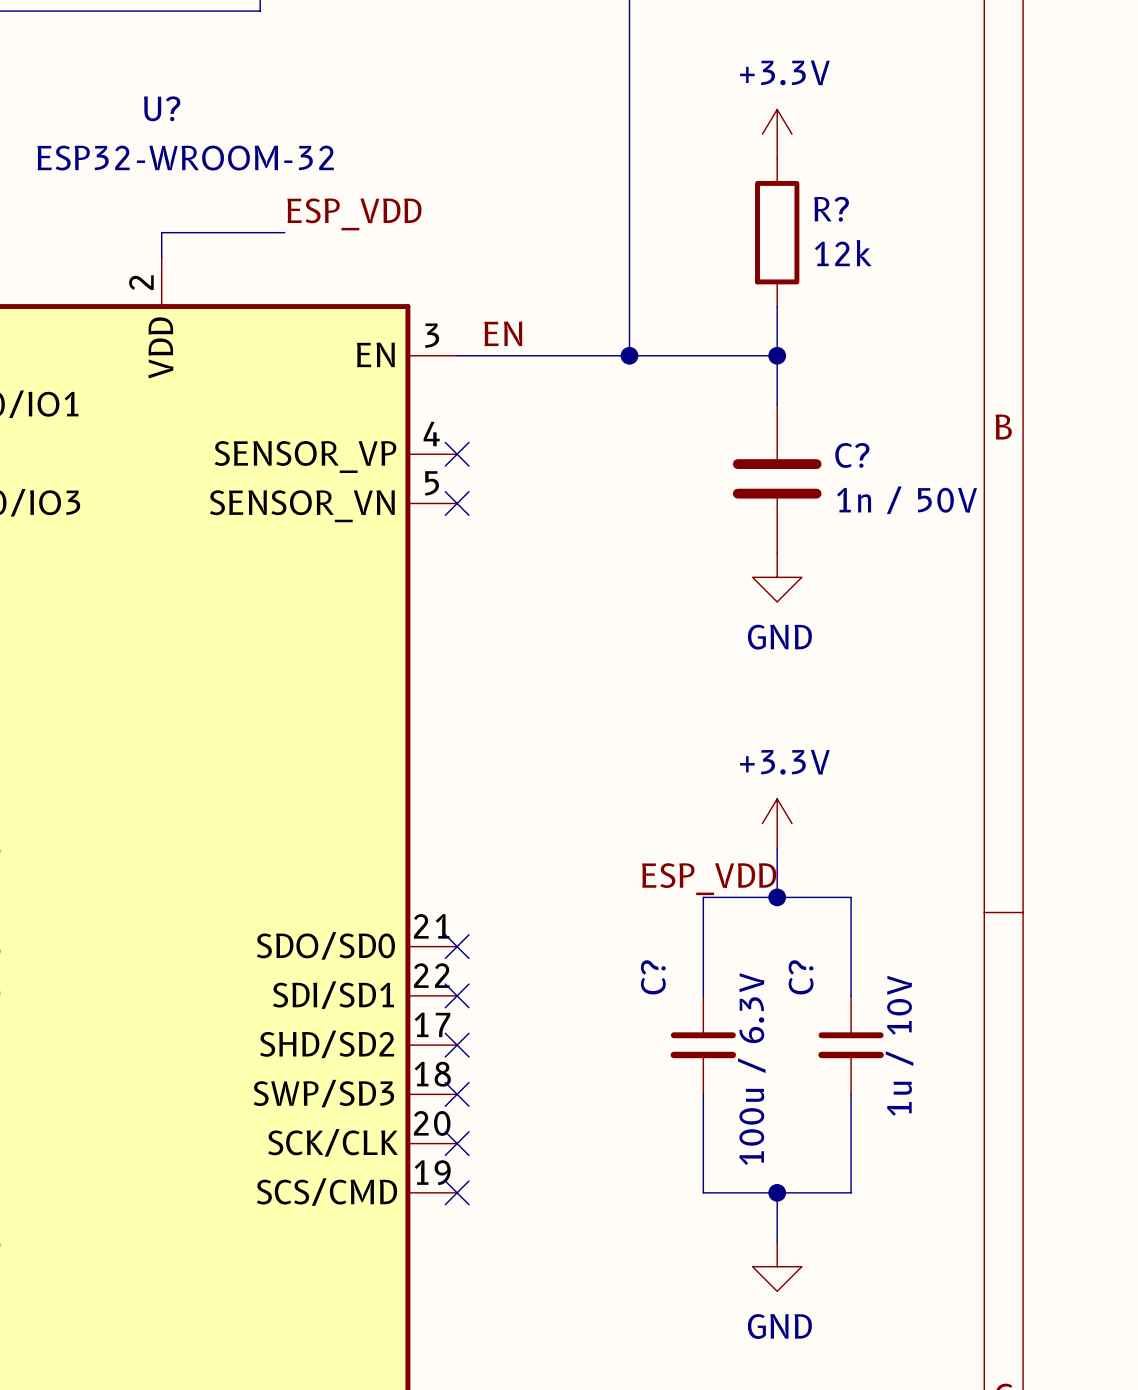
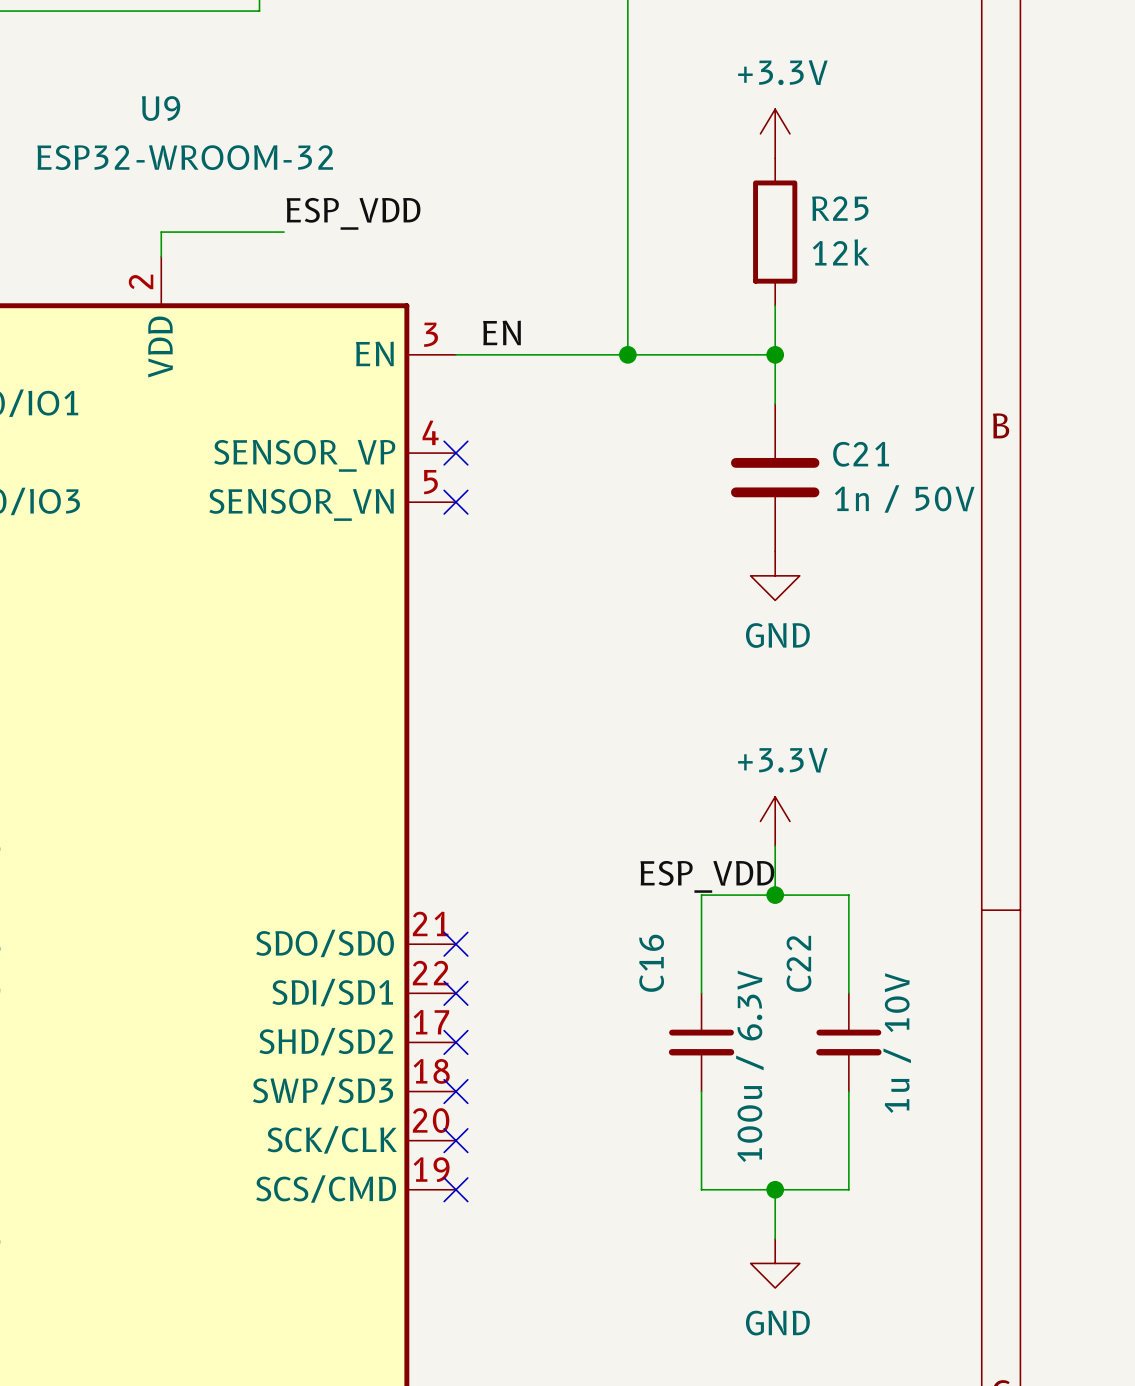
U? name: U? (162, 108) -> U9 (161, 108)
R? name: R? (831, 209) -> R25 (840, 208)
C? name: C? (852, 455) -> C21 (861, 454)
C? name: C? (653, 977) -> C16 (651, 963)
C? name: C? (801, 977) -> C22 (798, 963)

